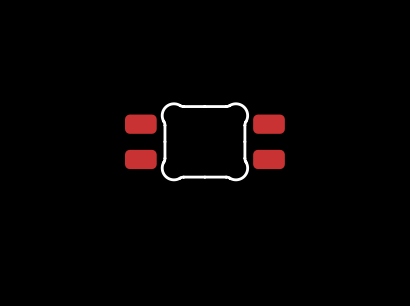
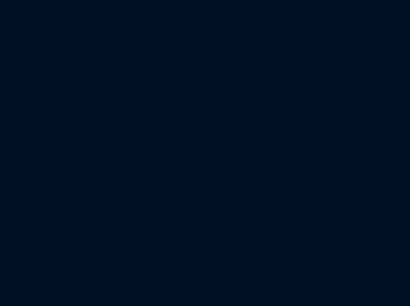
part: (204, 141) -> none

